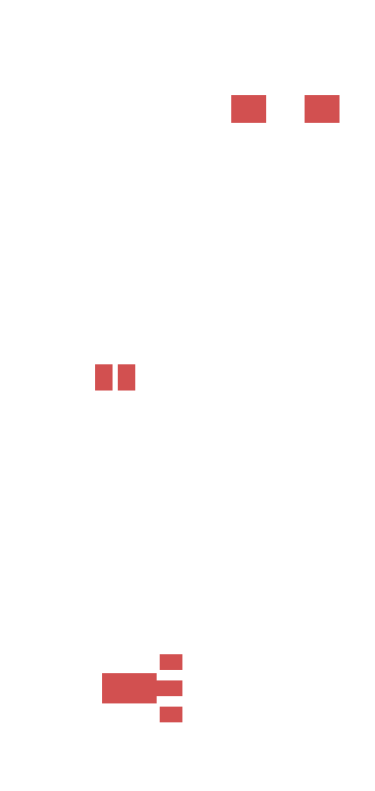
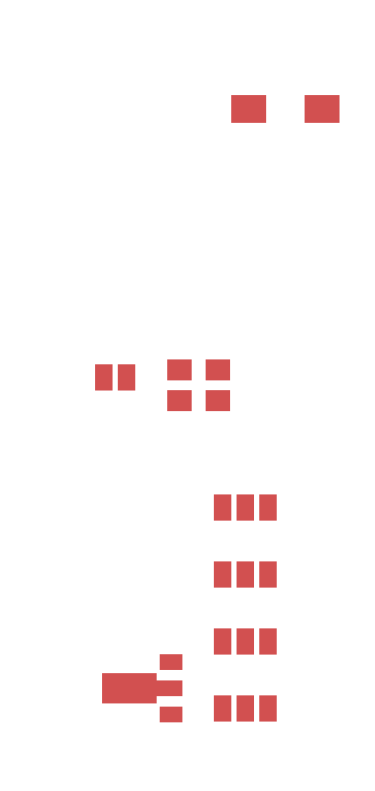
part: none -> (198, 385)
part: none -> (245, 507)
part: none -> (245, 574)
part: none -> (245, 641)
part: none -> (245, 708)

